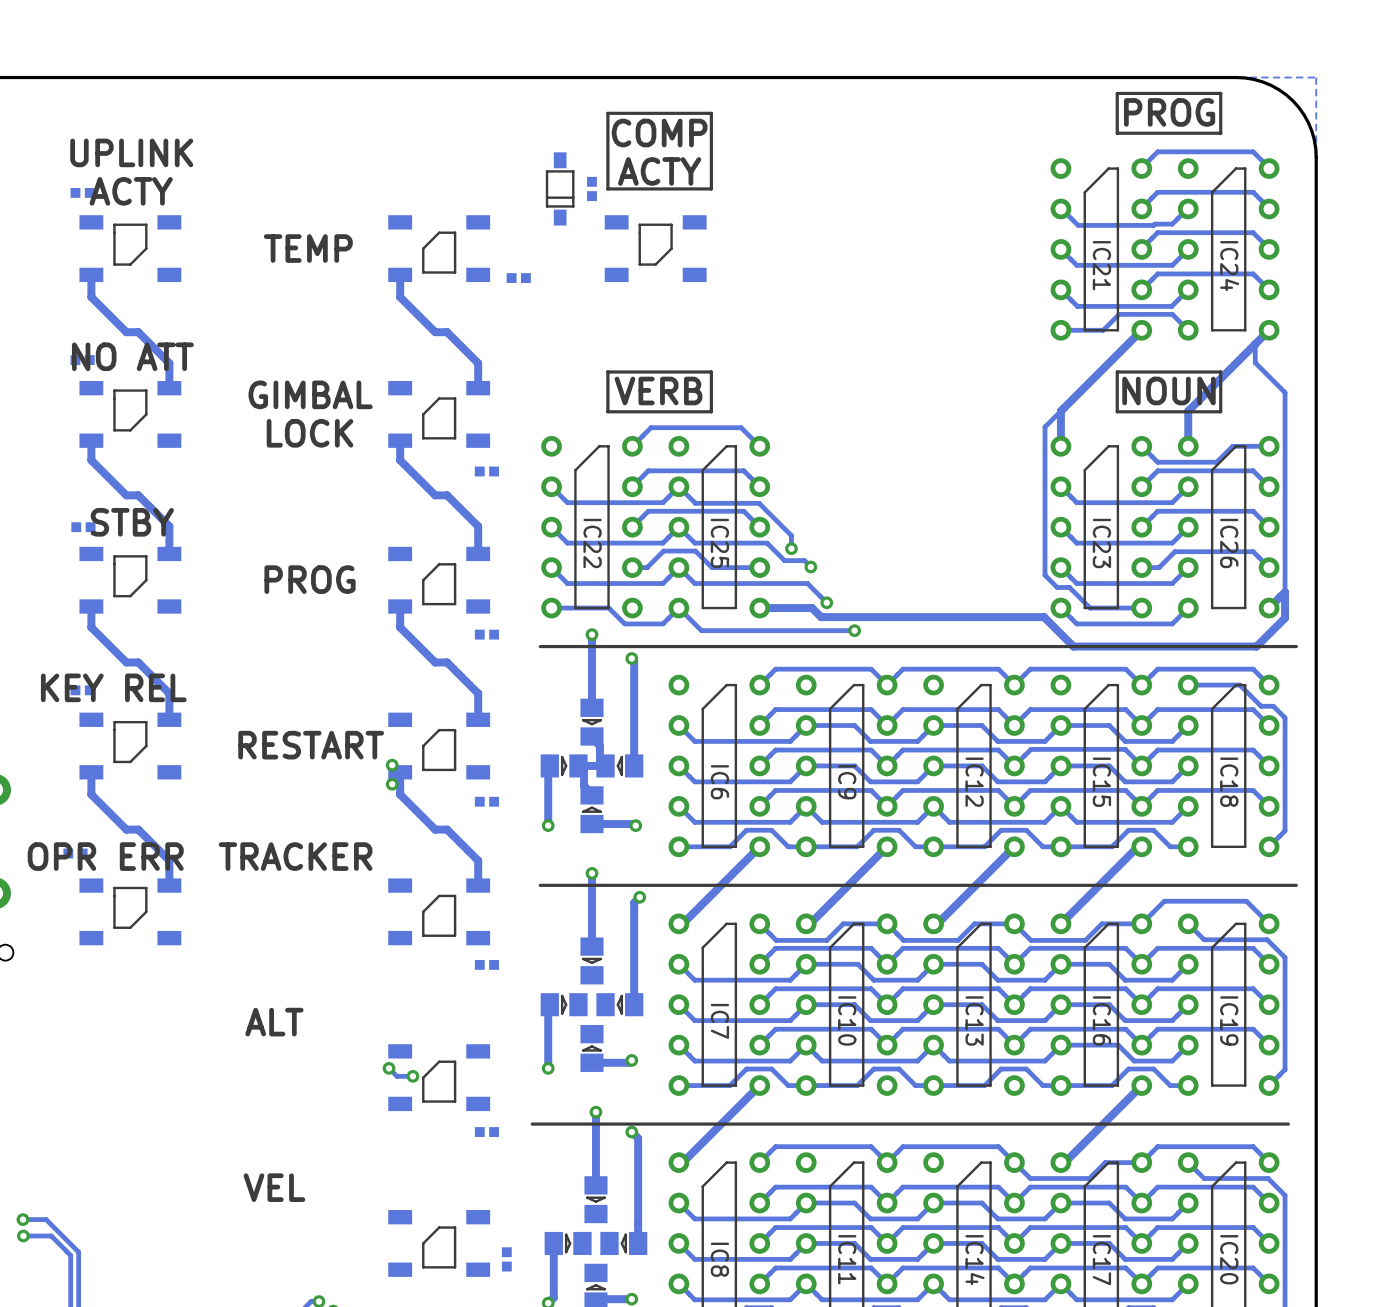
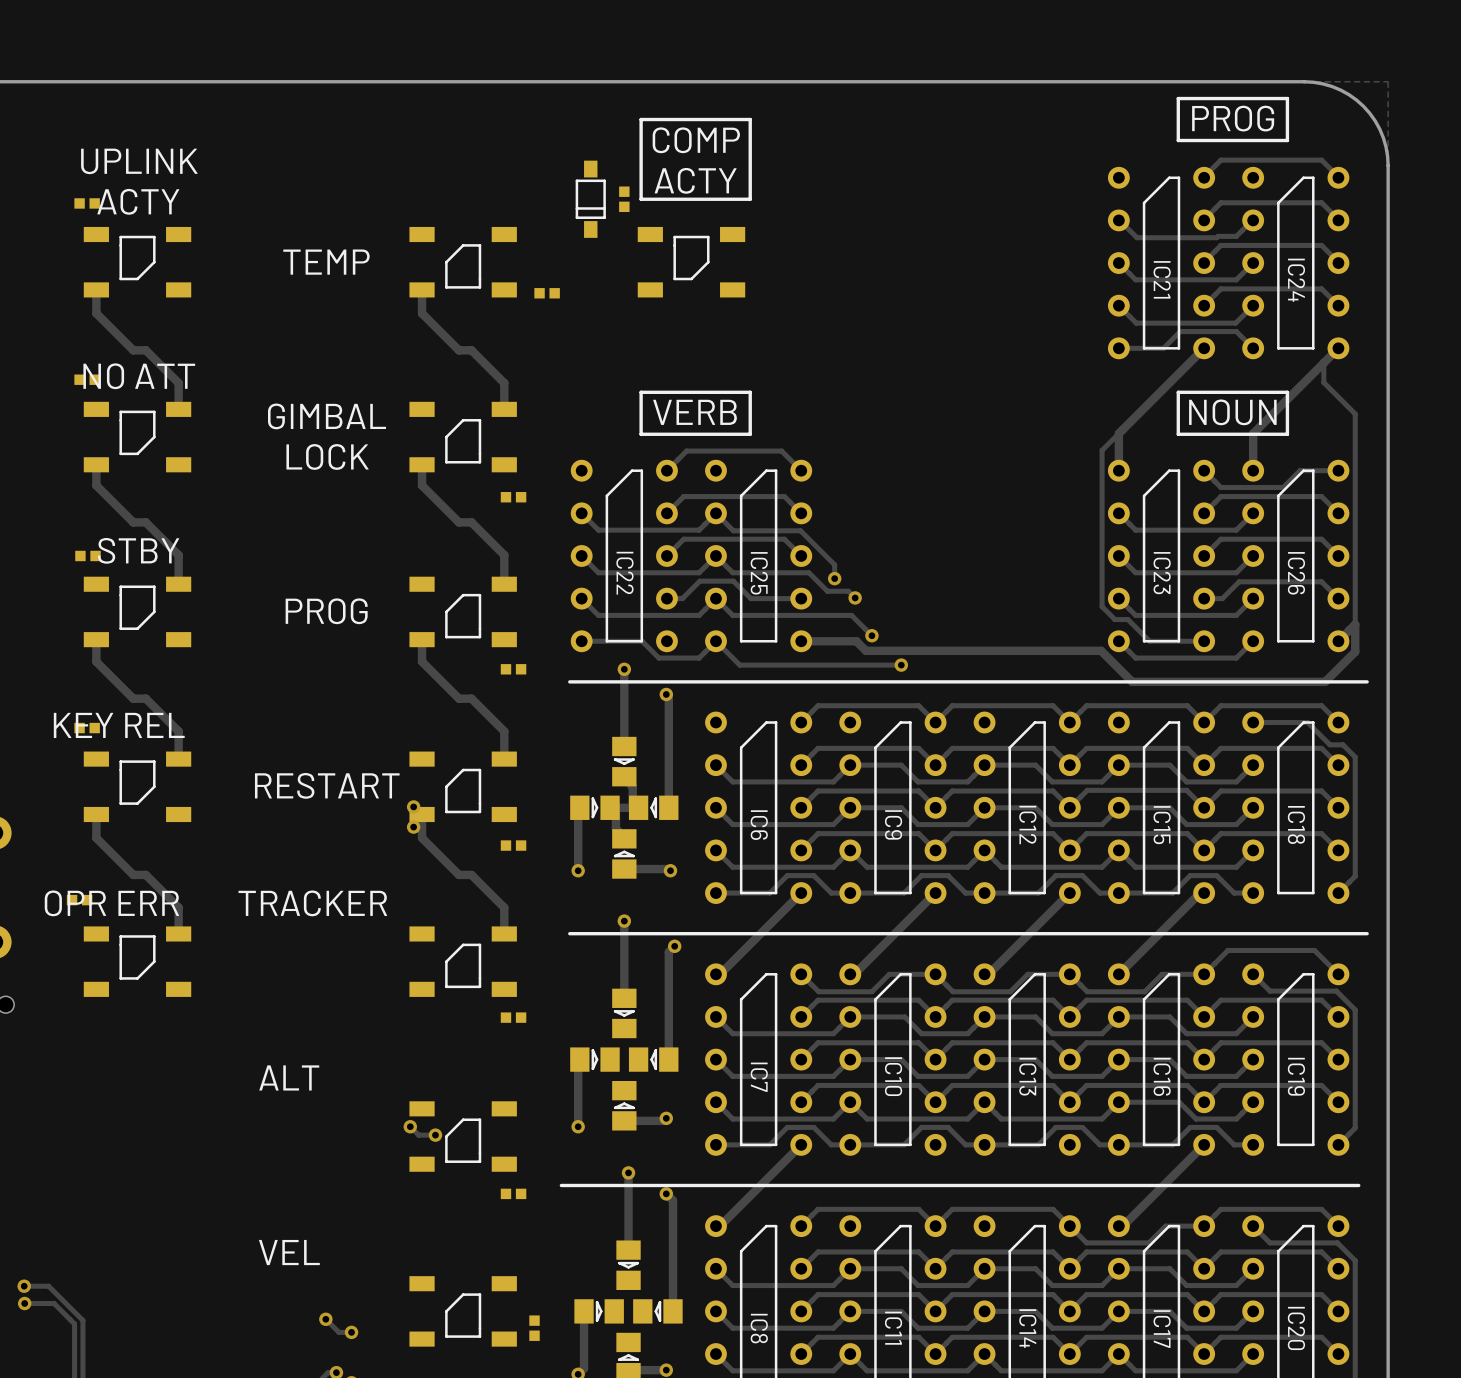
track: none -> (325, 1319) (338, 1332) (351, 1332)
via: none -> (325, 1319)
via: none -> (351, 1332)

